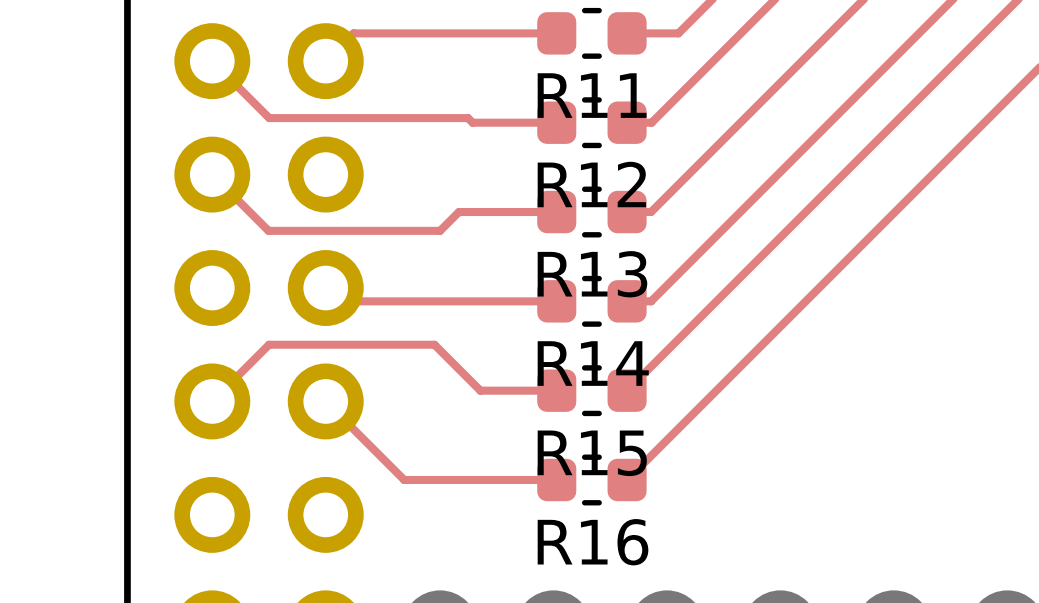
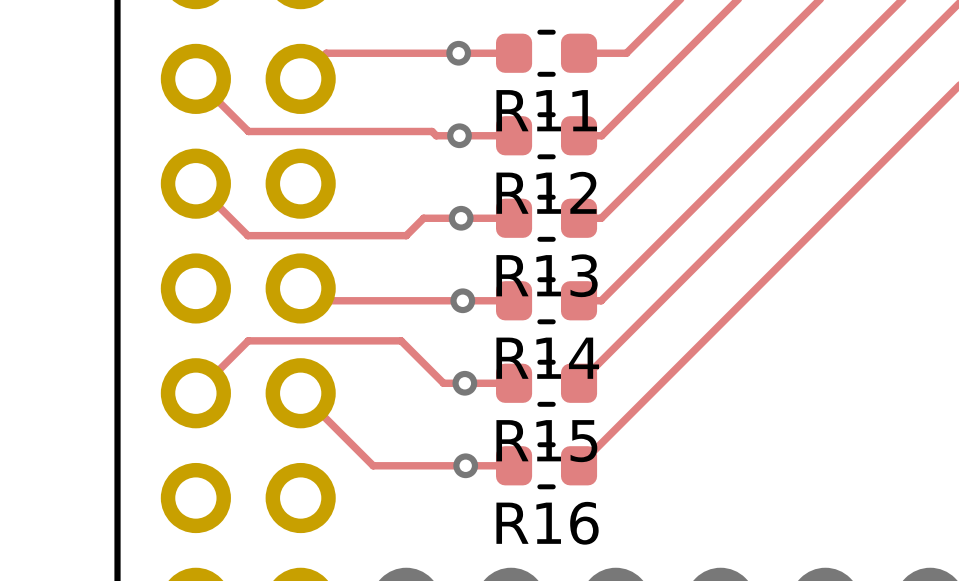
via: none -> (458, 53)
via: none -> (459, 135)
via: none -> (461, 218)
via: none -> (462, 300)
via: none -> (464, 383)
via: none -> (465, 465)

